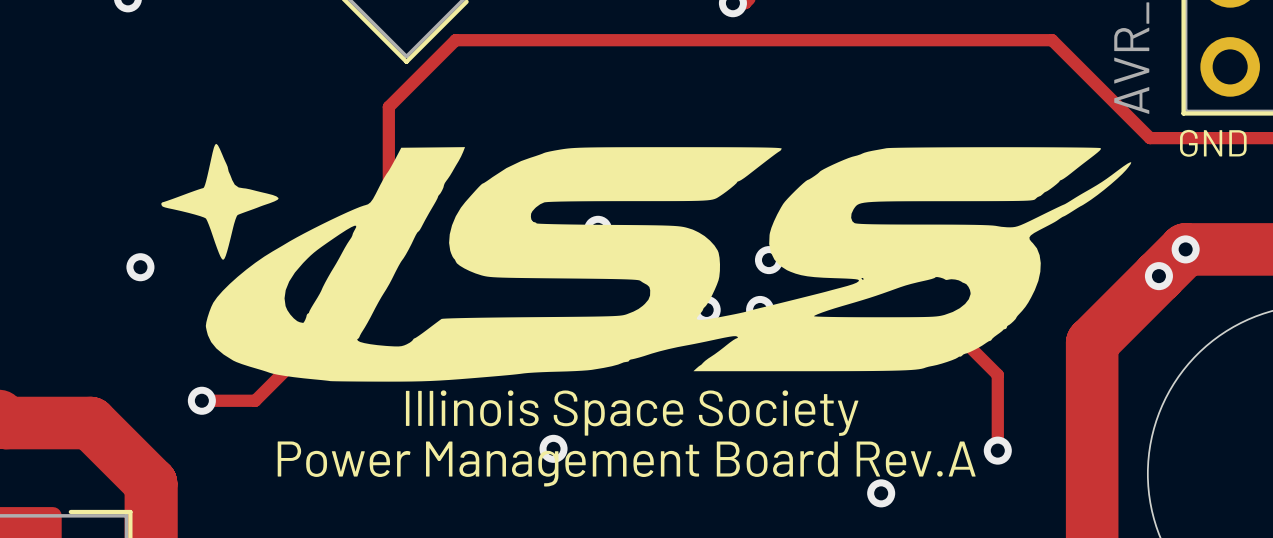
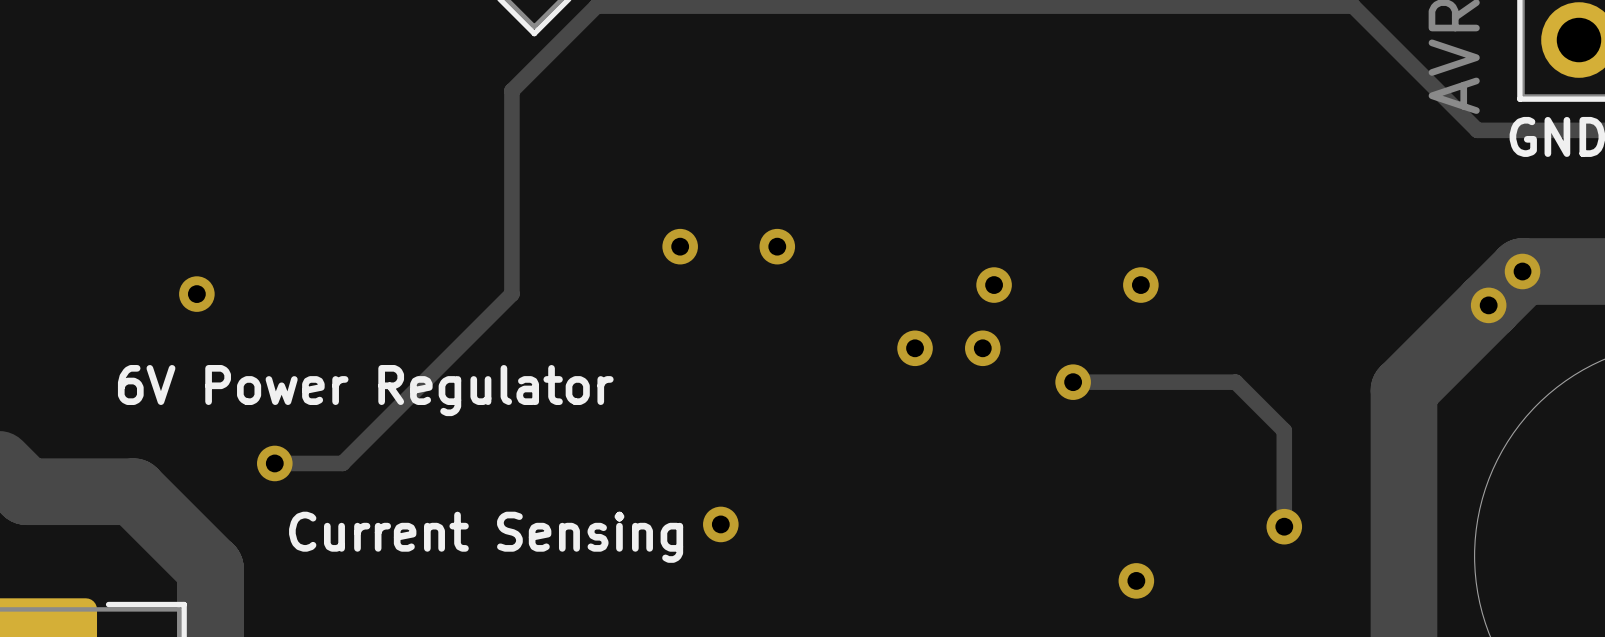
drawing: [161, 143, 1132, 382] -> none
text: none -> 6V Power Regulator (365, 390)
text: Illinois Space Society (632, 413) -> none
text: none -> Current Sensing (486, 537)
text: Power Management Board Rev.A (626, 463) -> none

